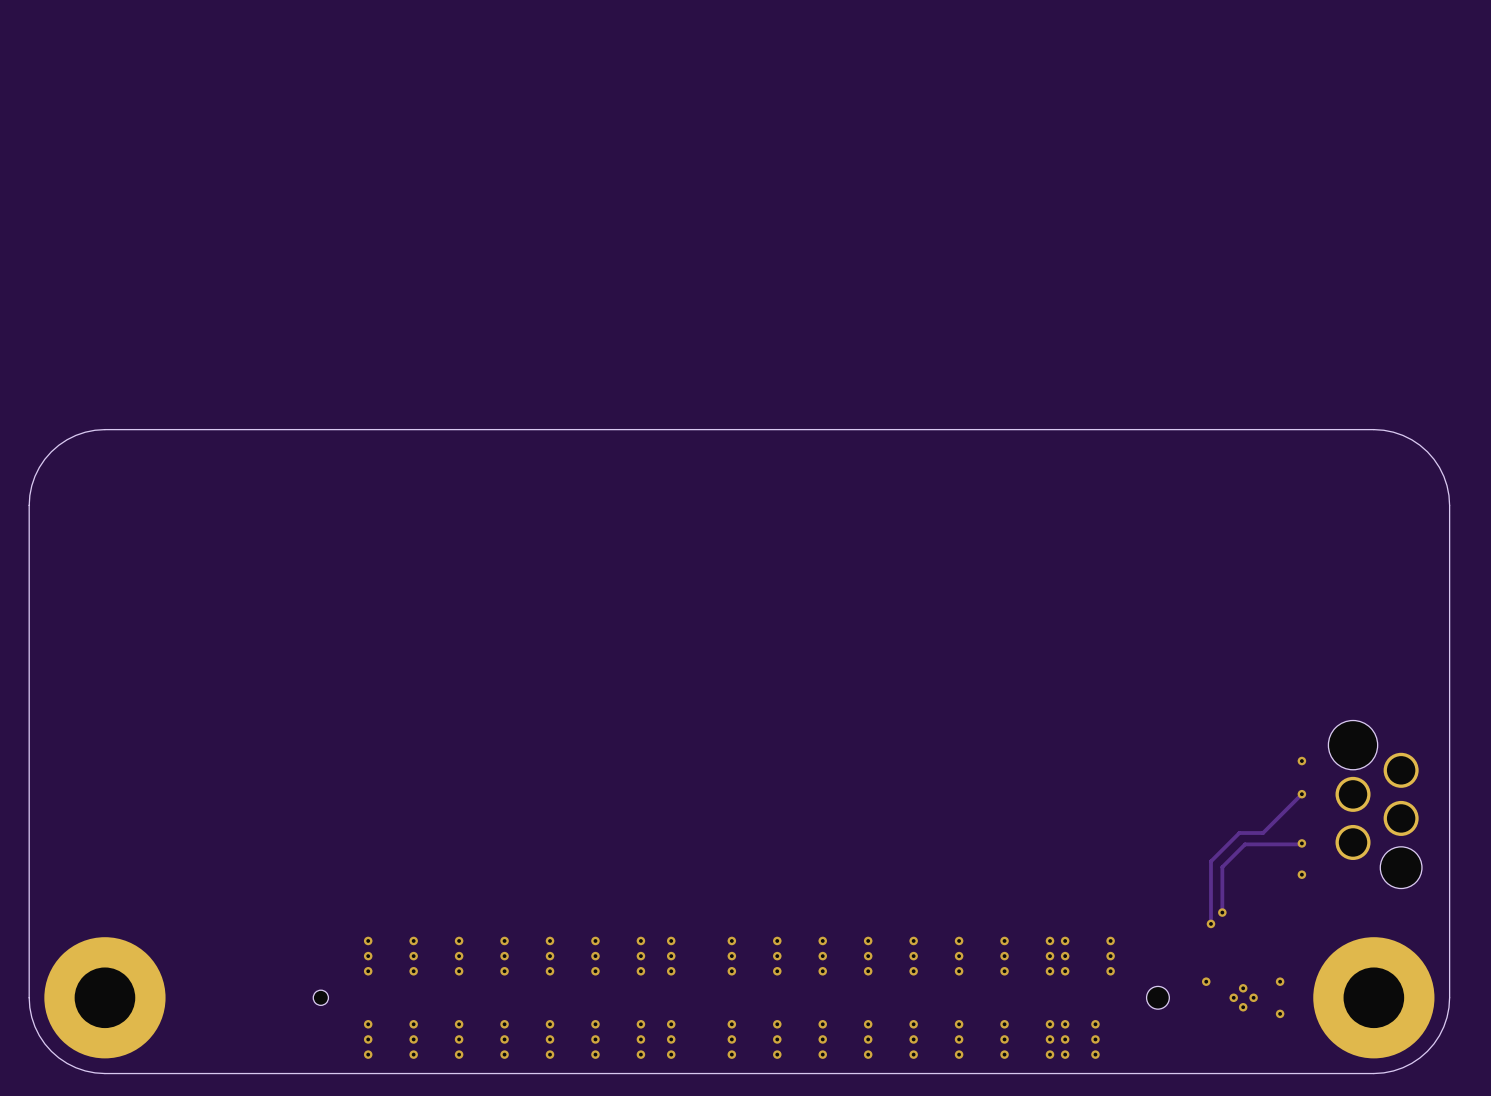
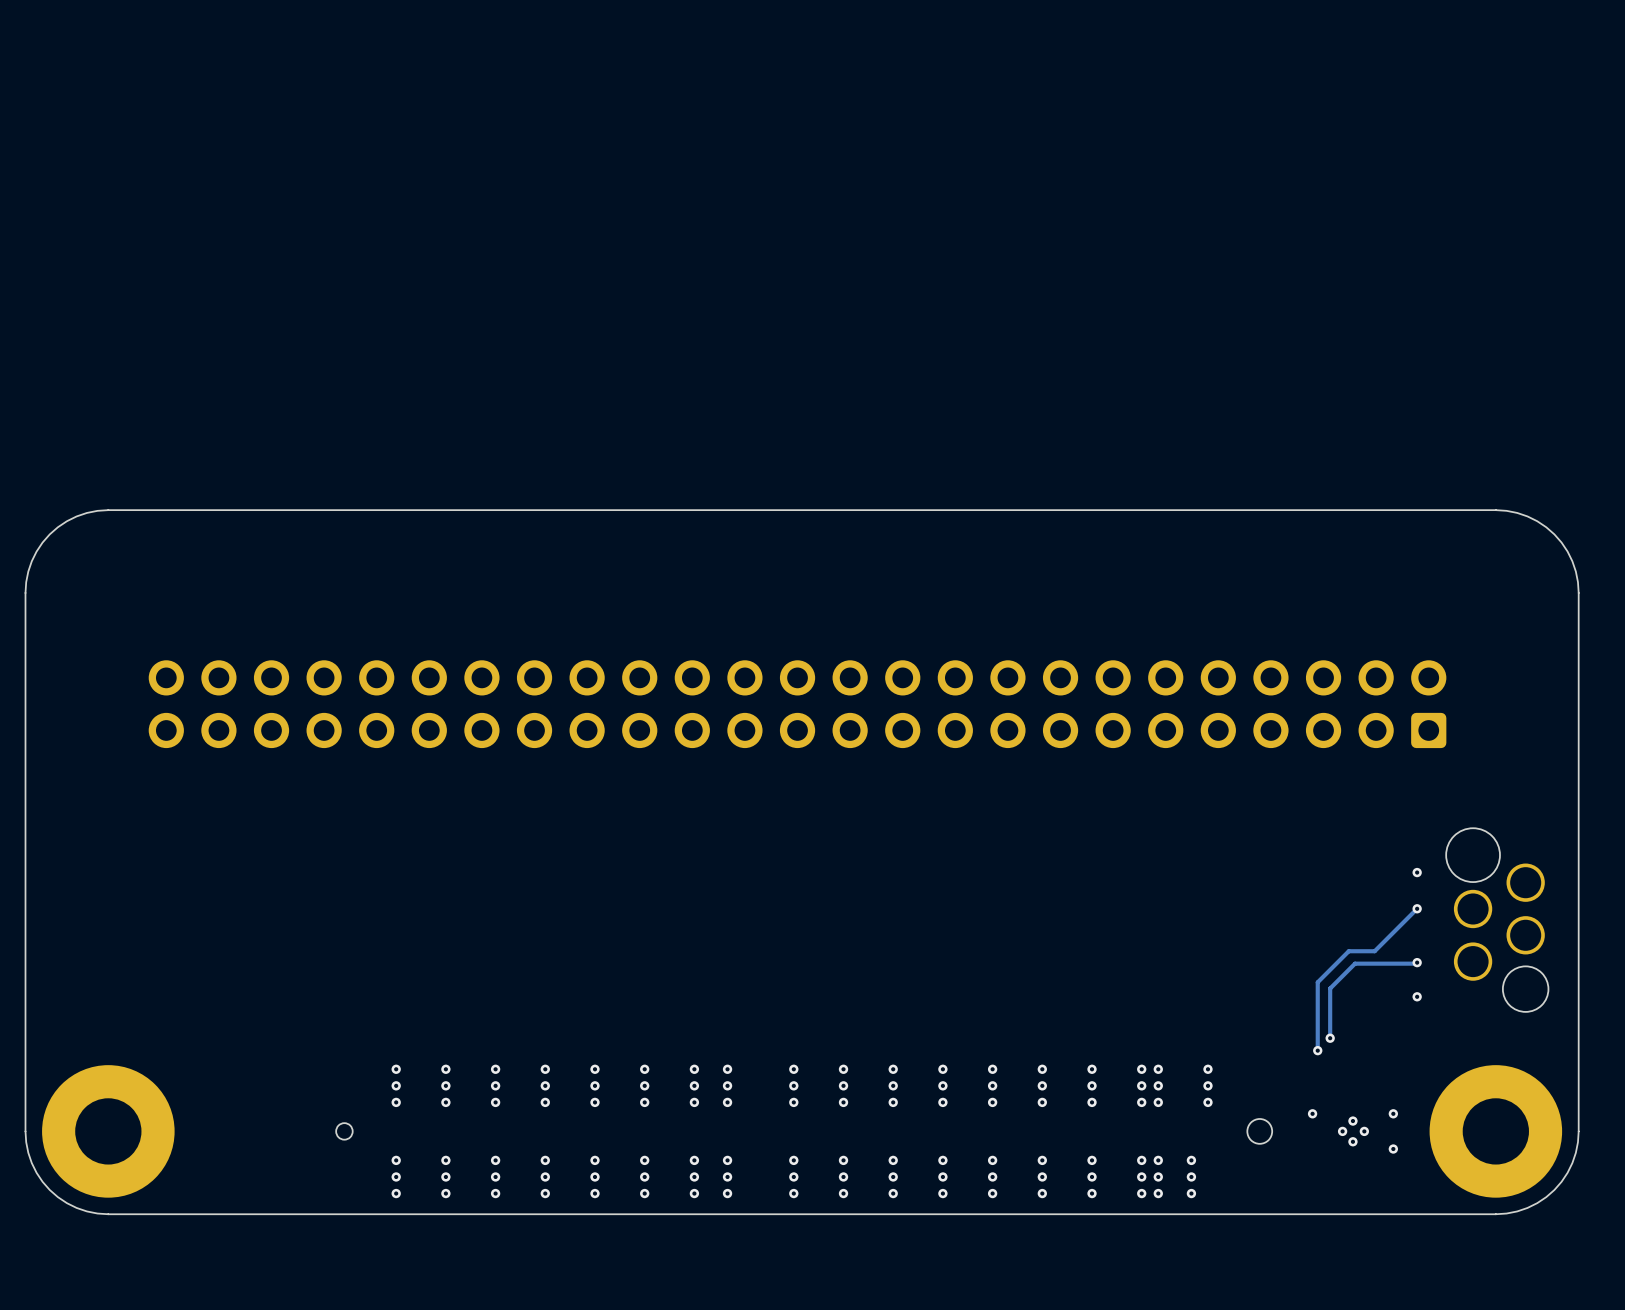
part: none -> (797, 704)

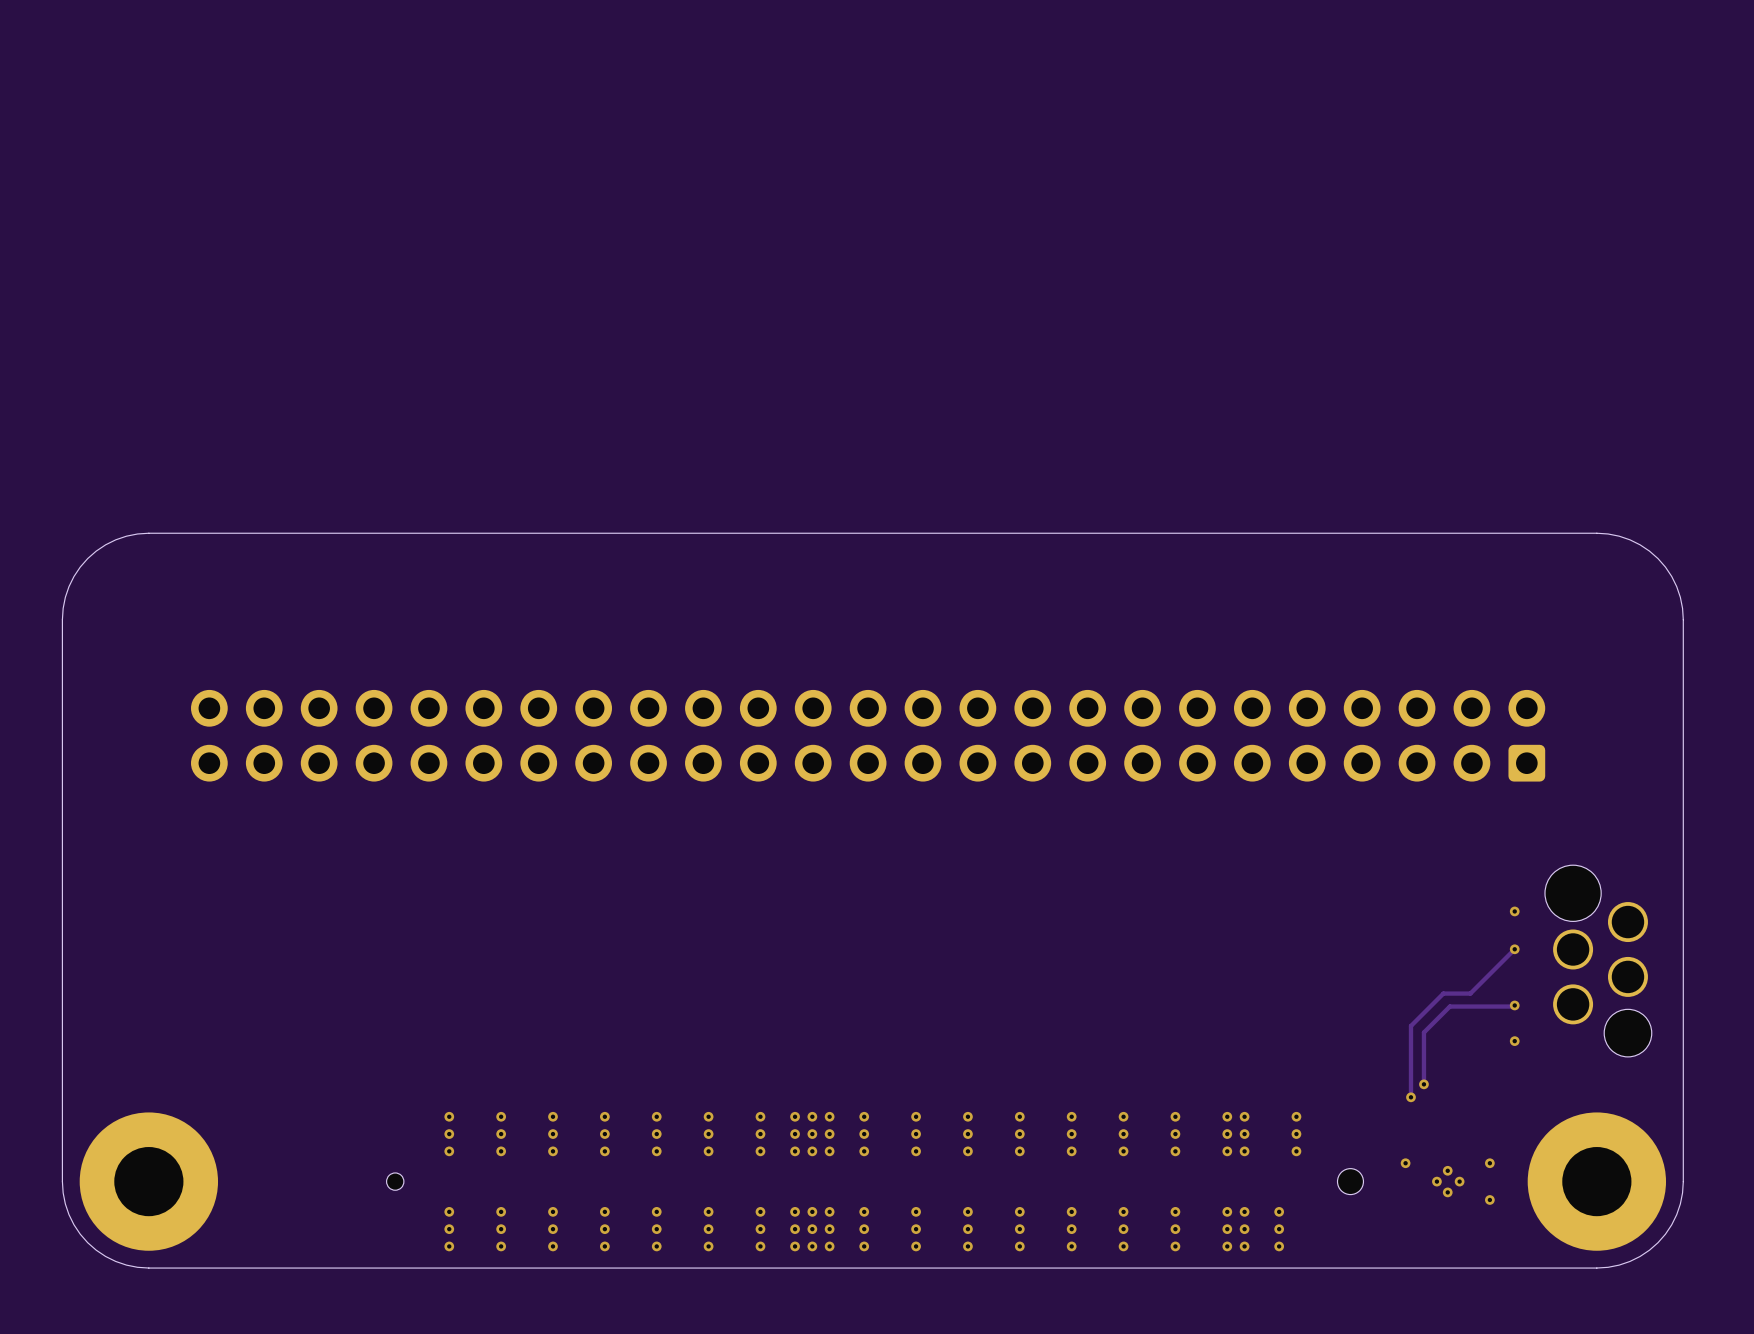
via: none -> (812, 1116)
via: none -> (829, 1116)
via: none -> (812, 1134)
via: none -> (829, 1134)
via: none -> (812, 1151)
via: none -> (829, 1151)
via: none -> (812, 1211)
via: none -> (829, 1211)
via: none -> (812, 1229)
via: none -> (829, 1229)
via: none -> (812, 1246)
via: none -> (829, 1246)

